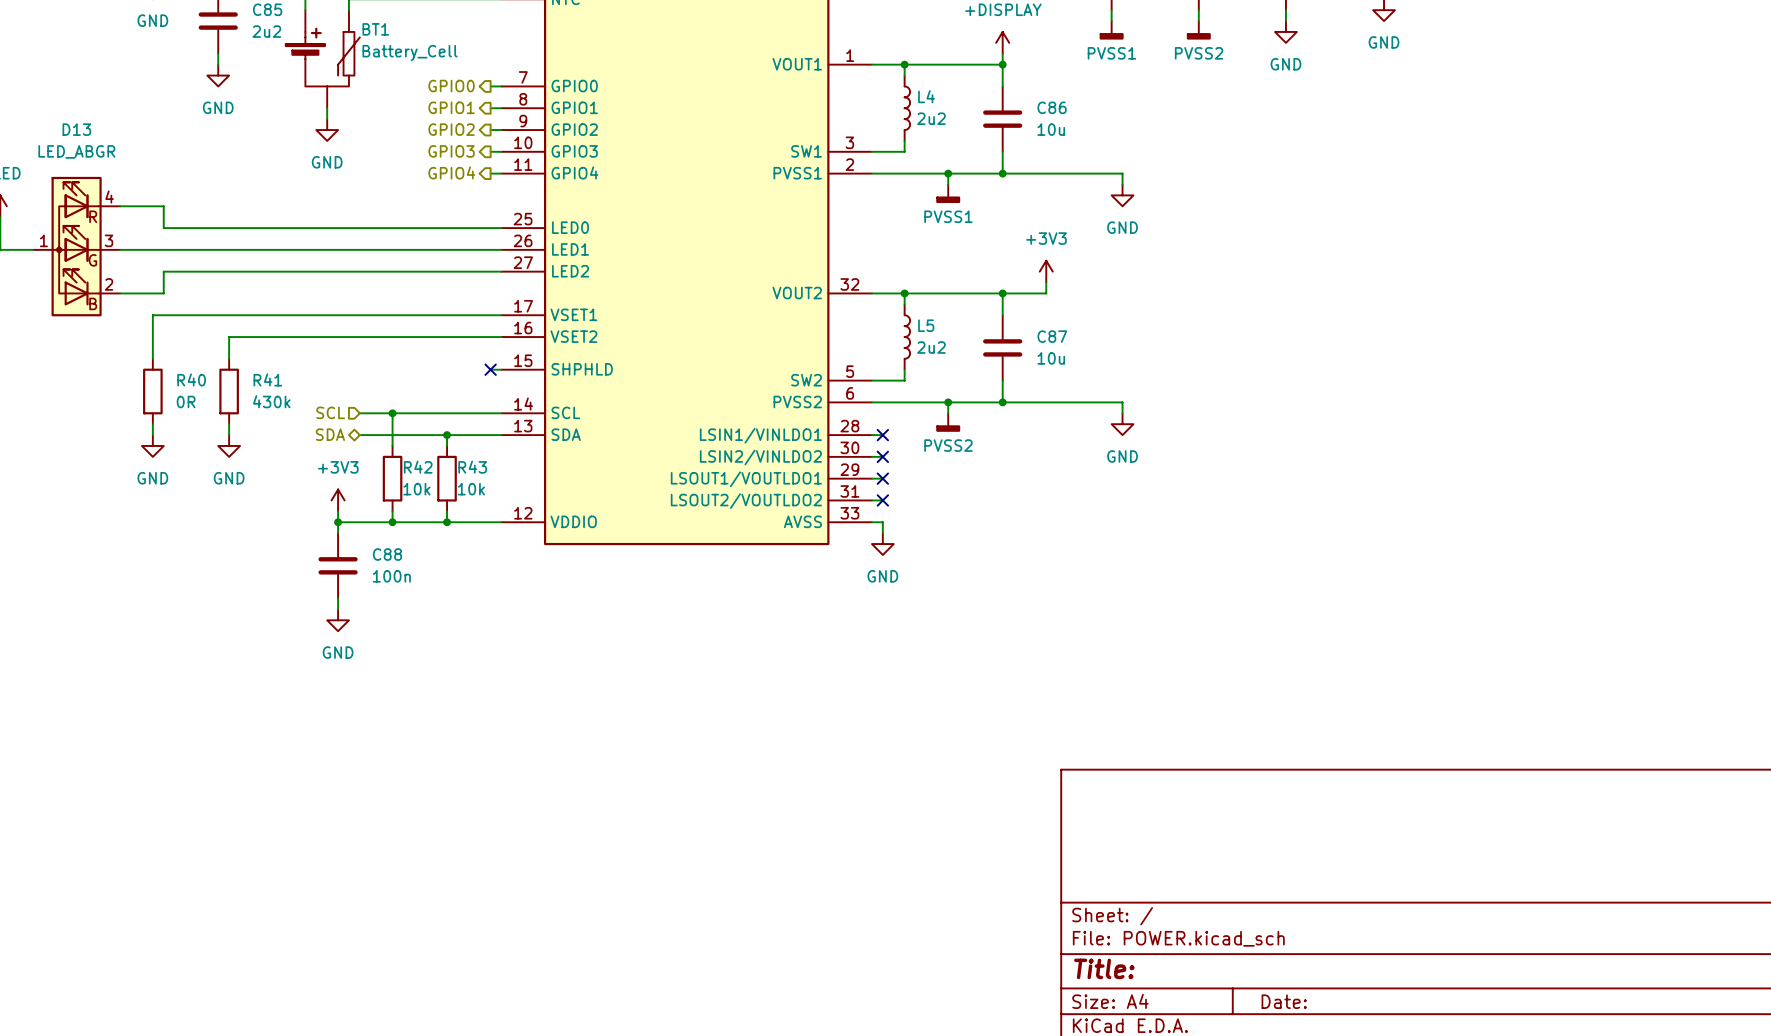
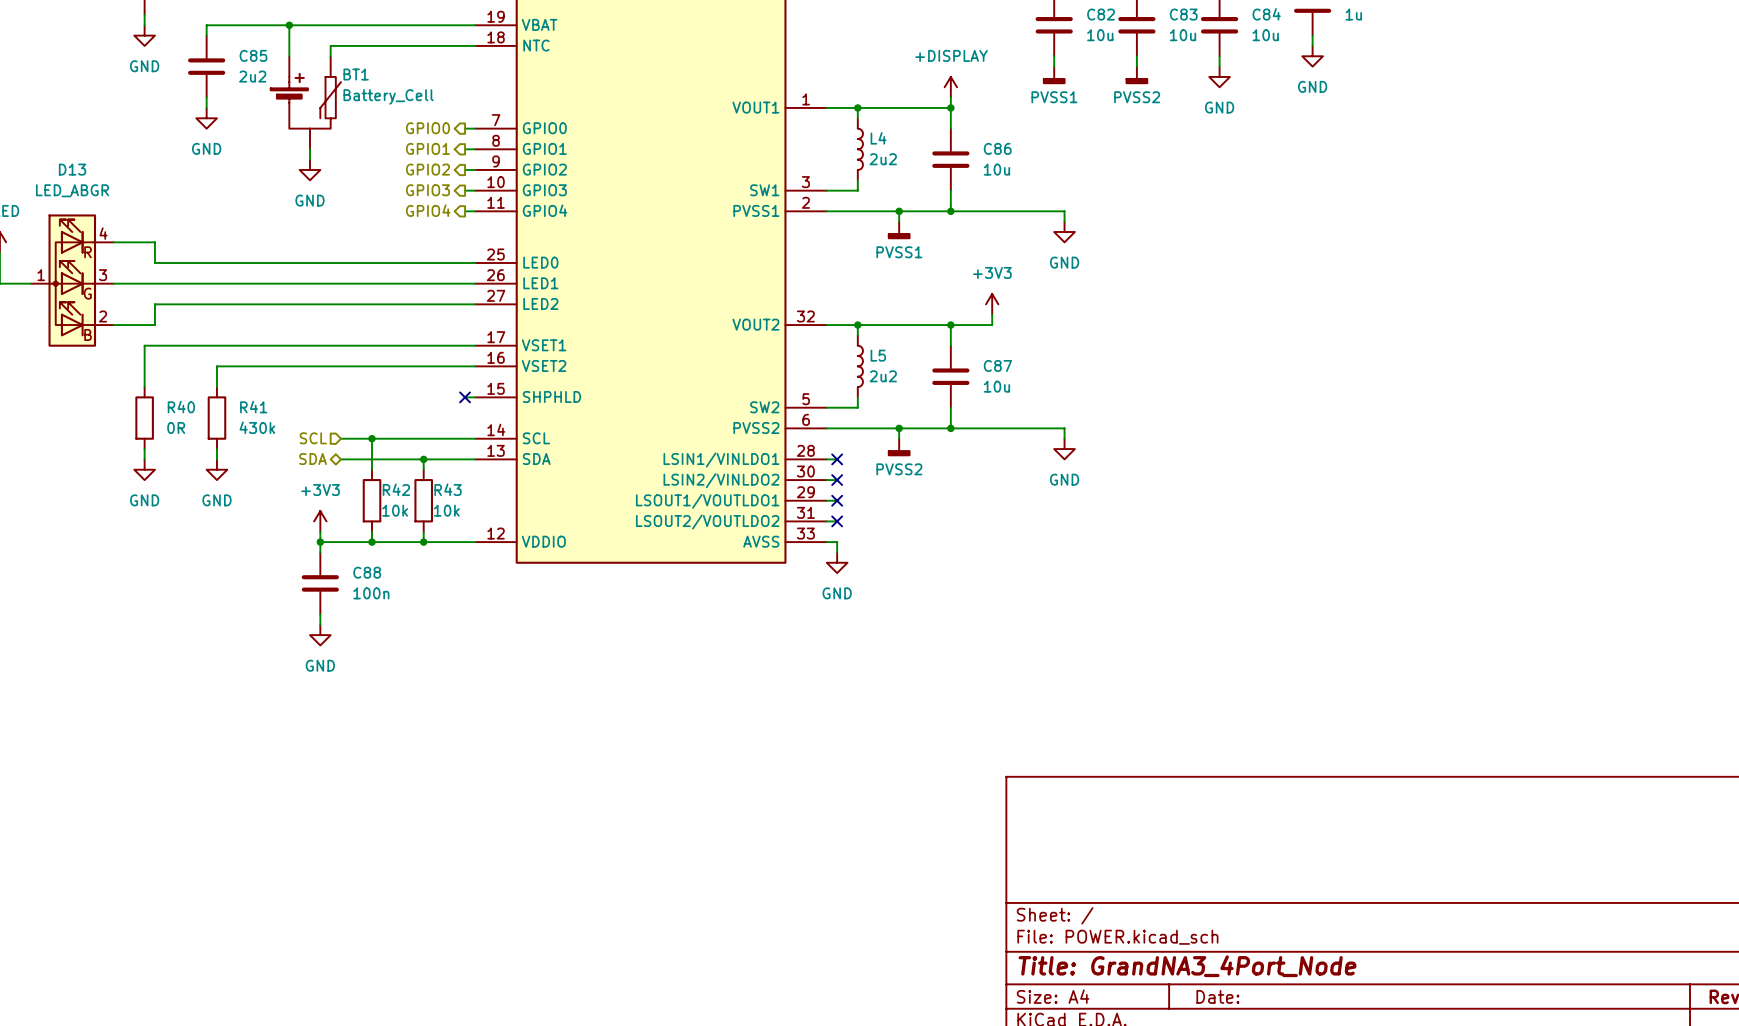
title block: Title: (1104, 968) -> Title: GrandNA3_4Port_Node (1187, 966)

